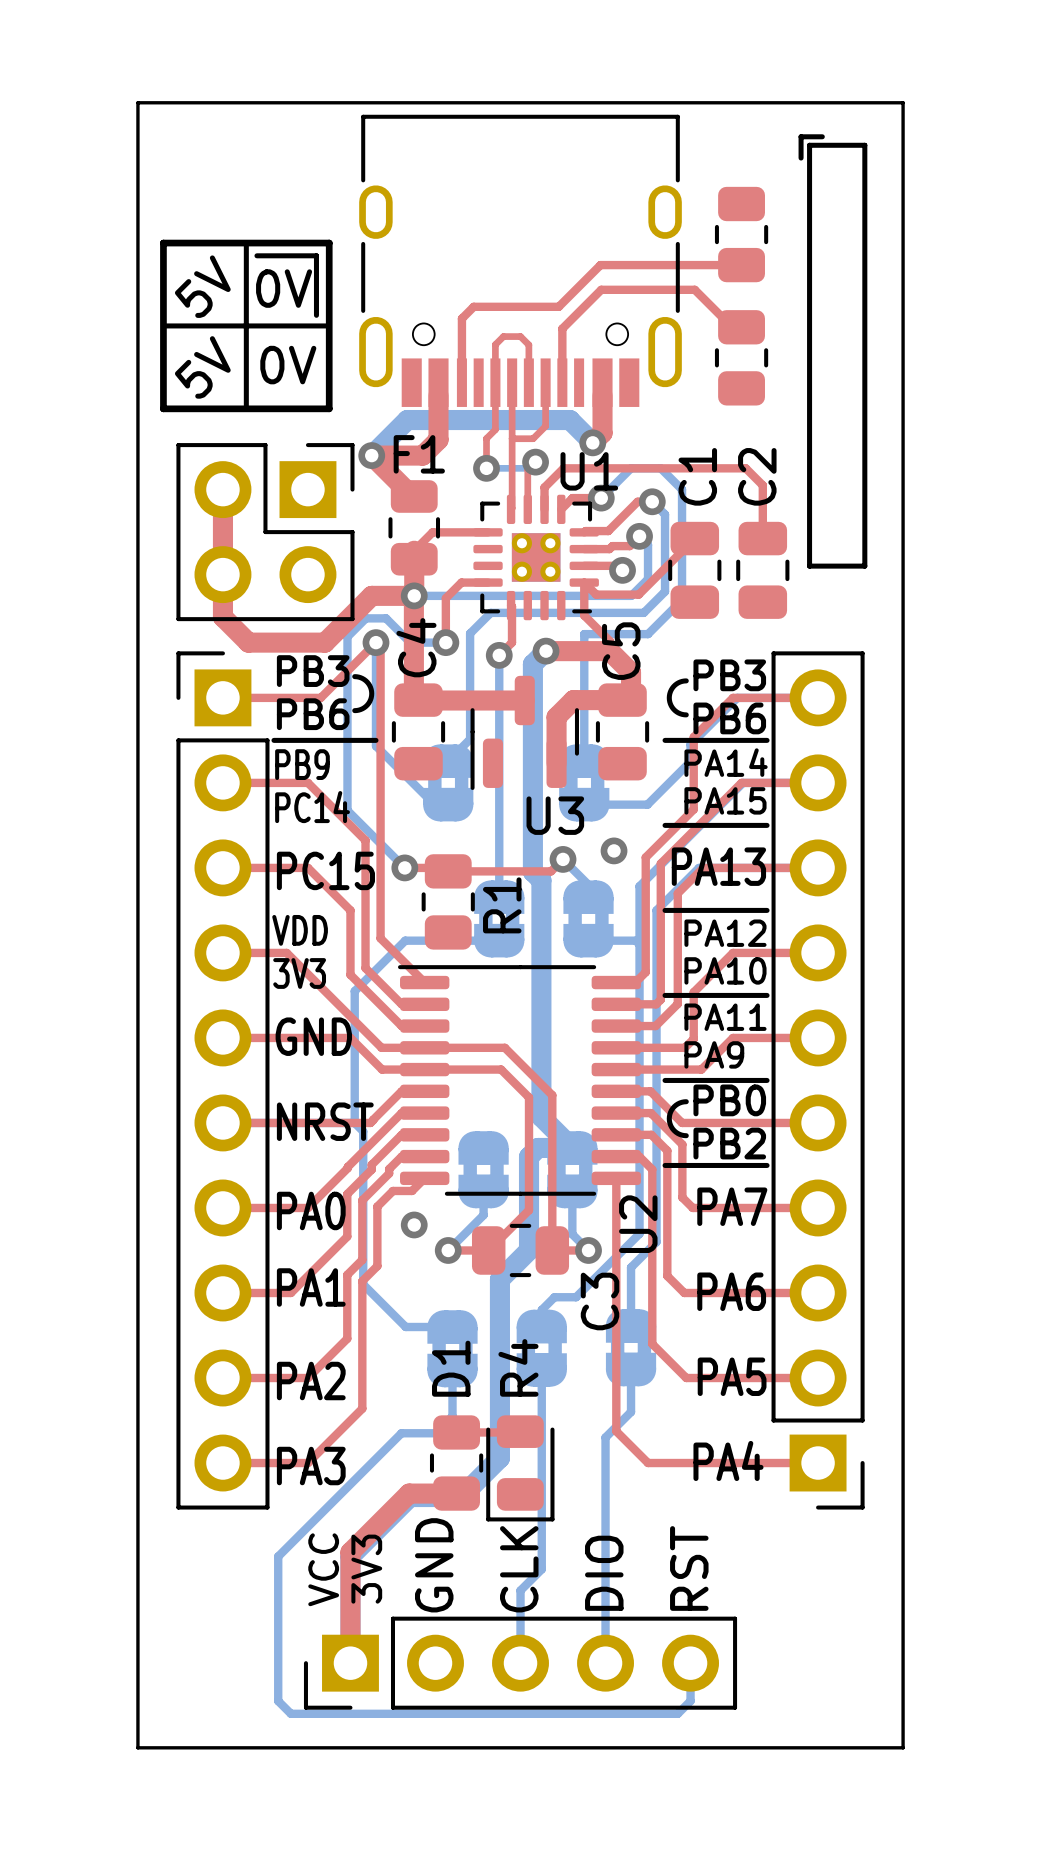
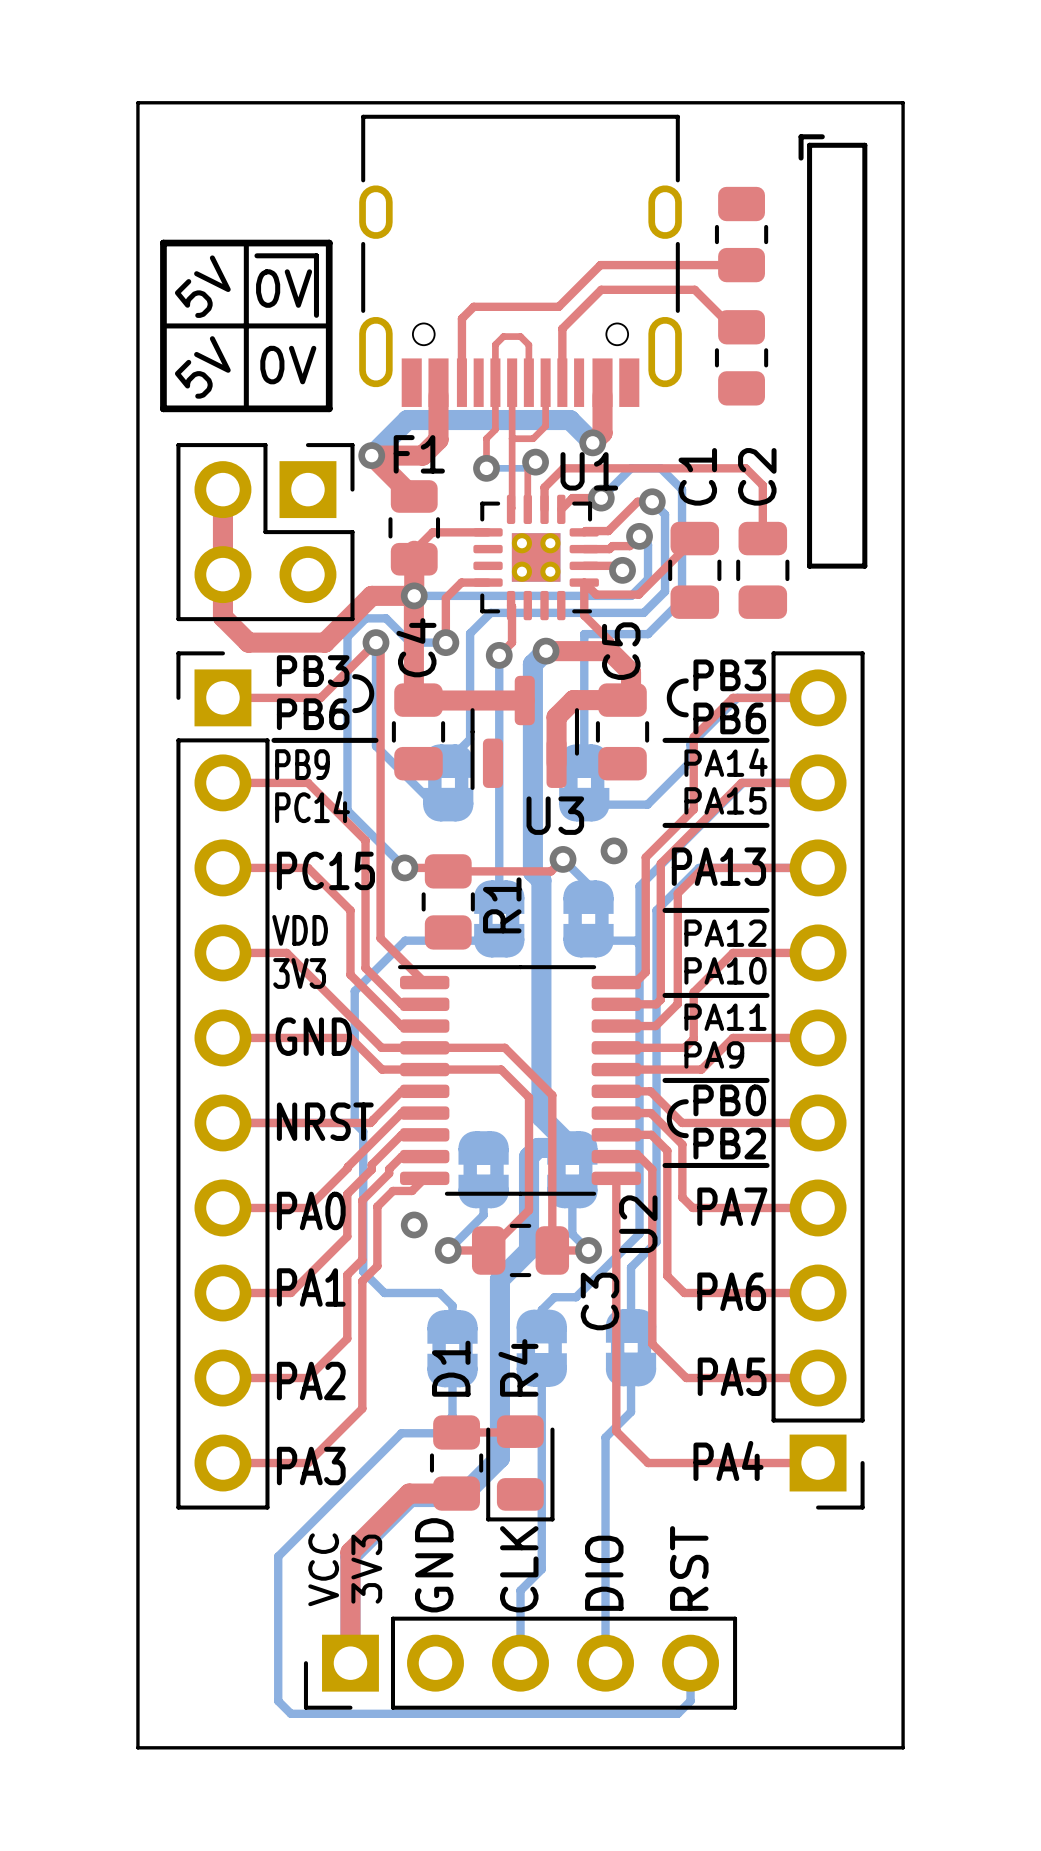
bottom track: (363, 1271) (363, 1284) (405, 1326) (452, 1326) -> (363, 1271) (384, 1292) (439, 1292) (452, 1305) (452, 1326)

